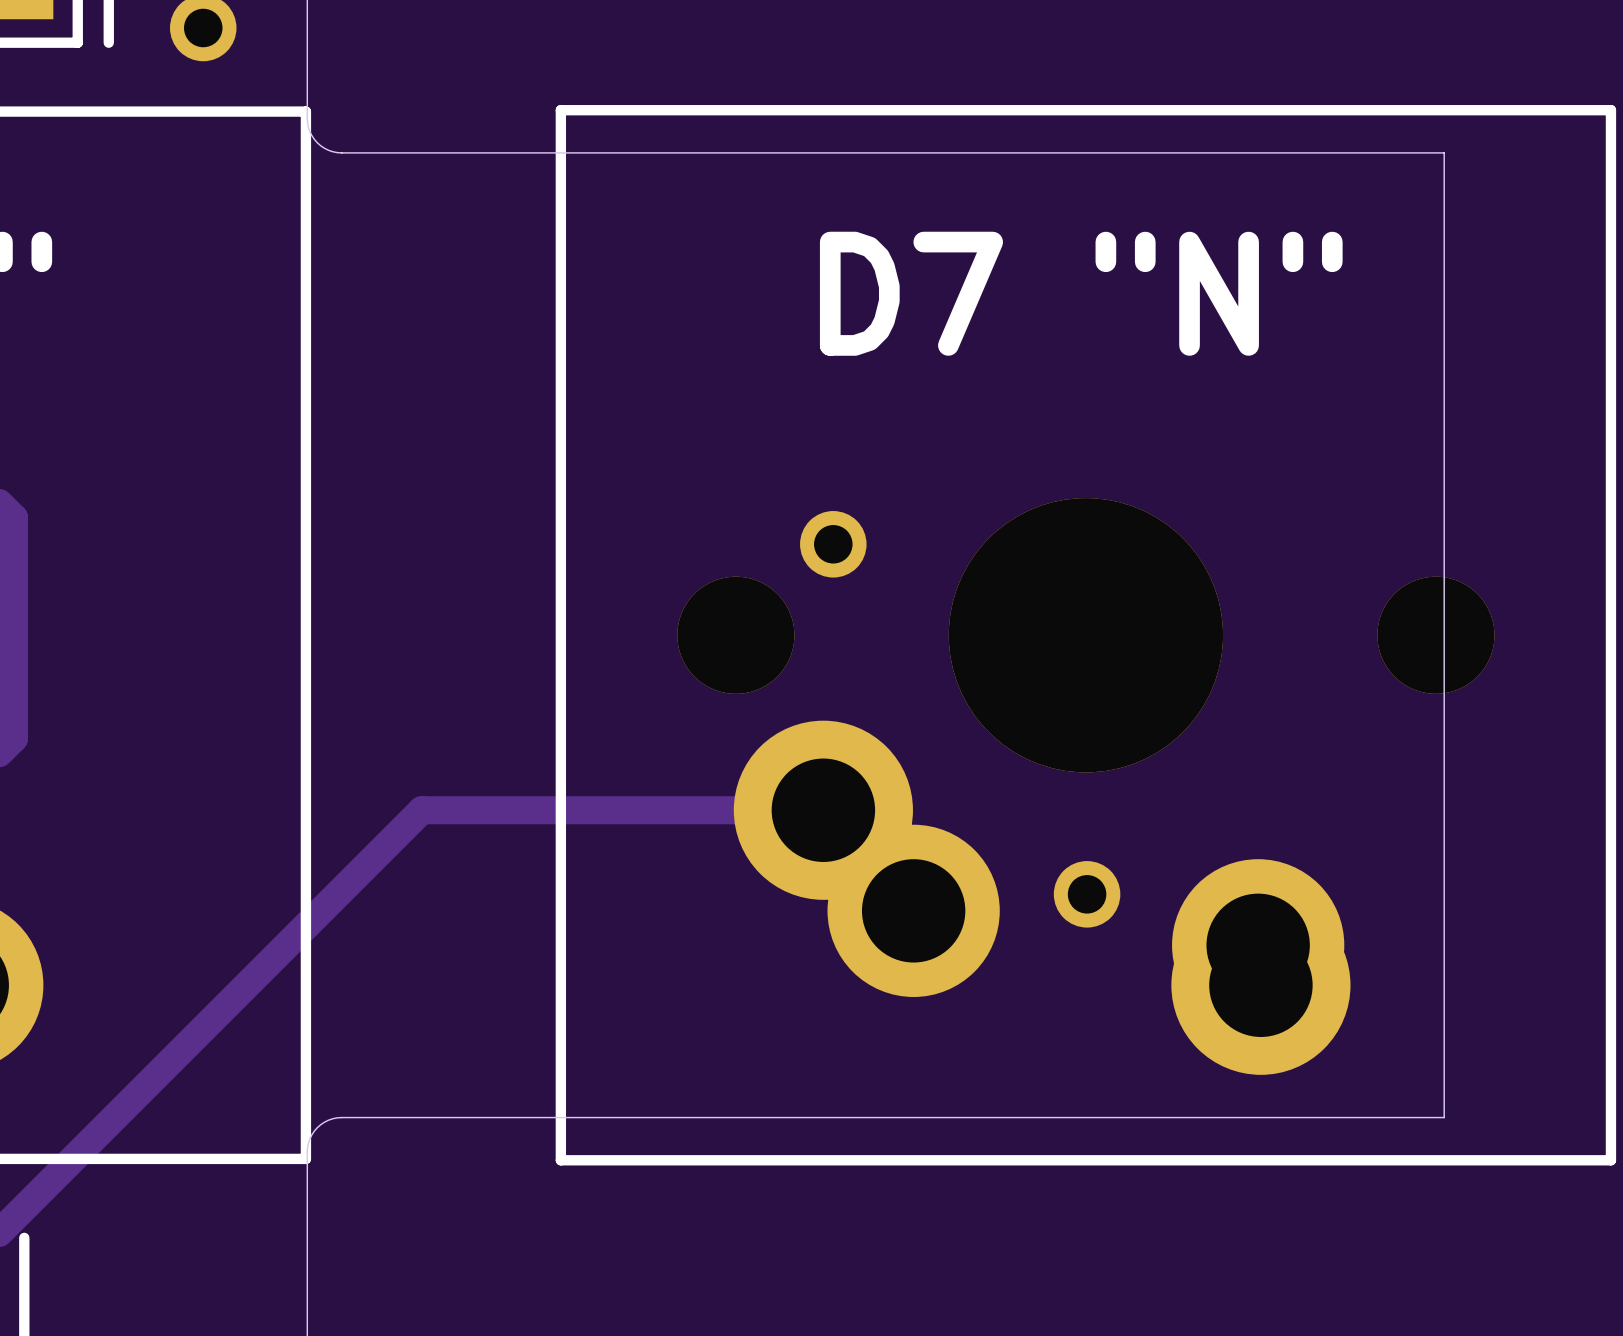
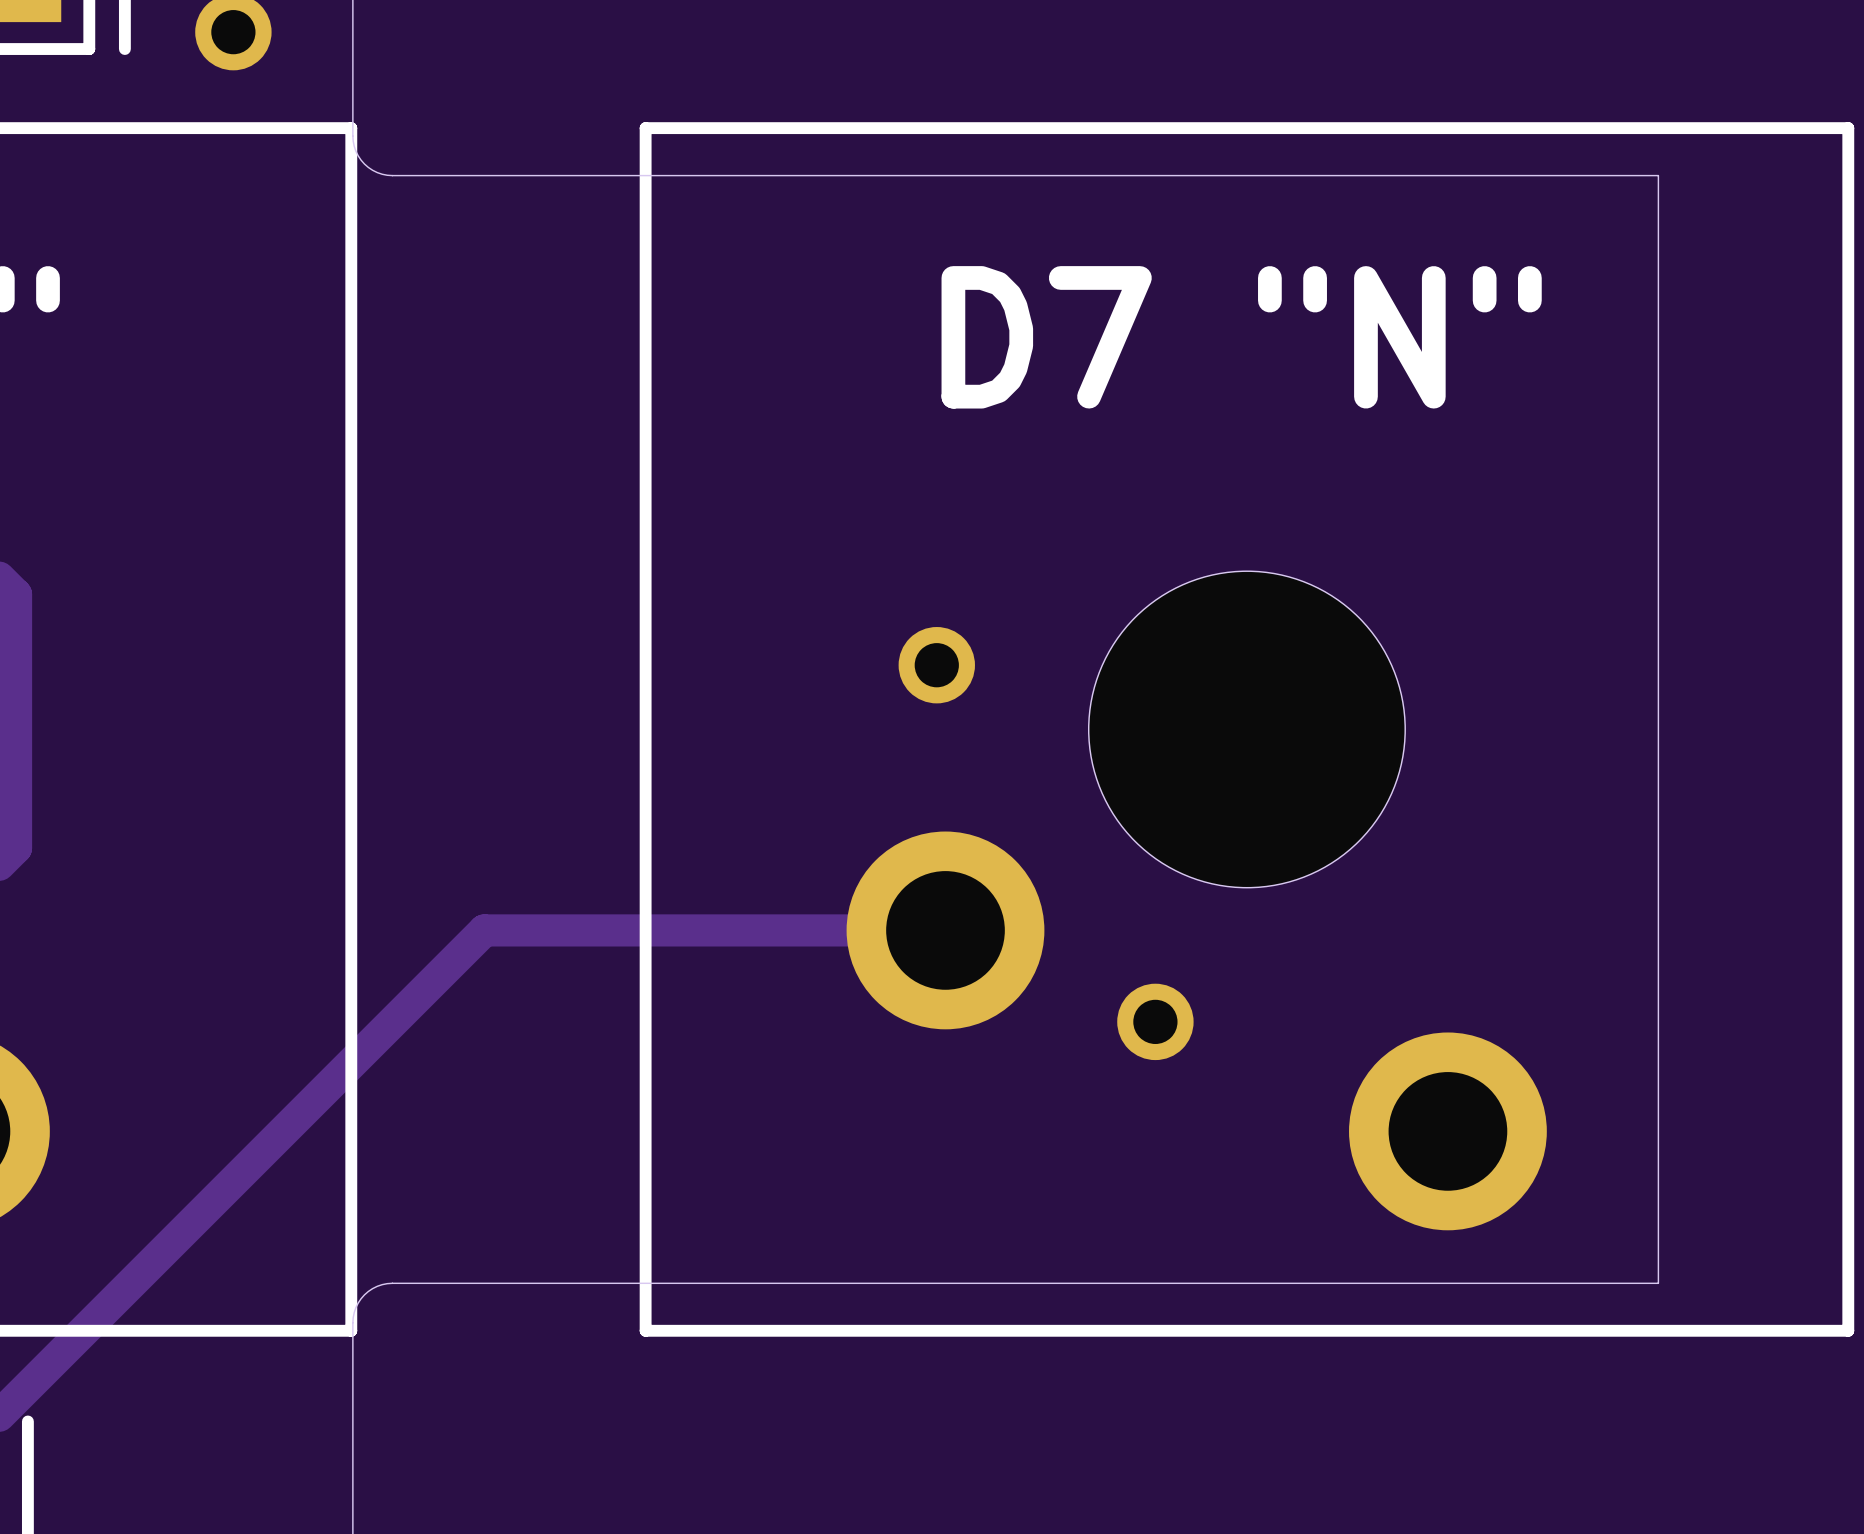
part footprint: [555, 105, 1617, 1166] -> [639, 122, 1855, 1337]
part position: (833, 544) -> (936, 665)
part position: (1087, 894) -> (1155, 1021)

